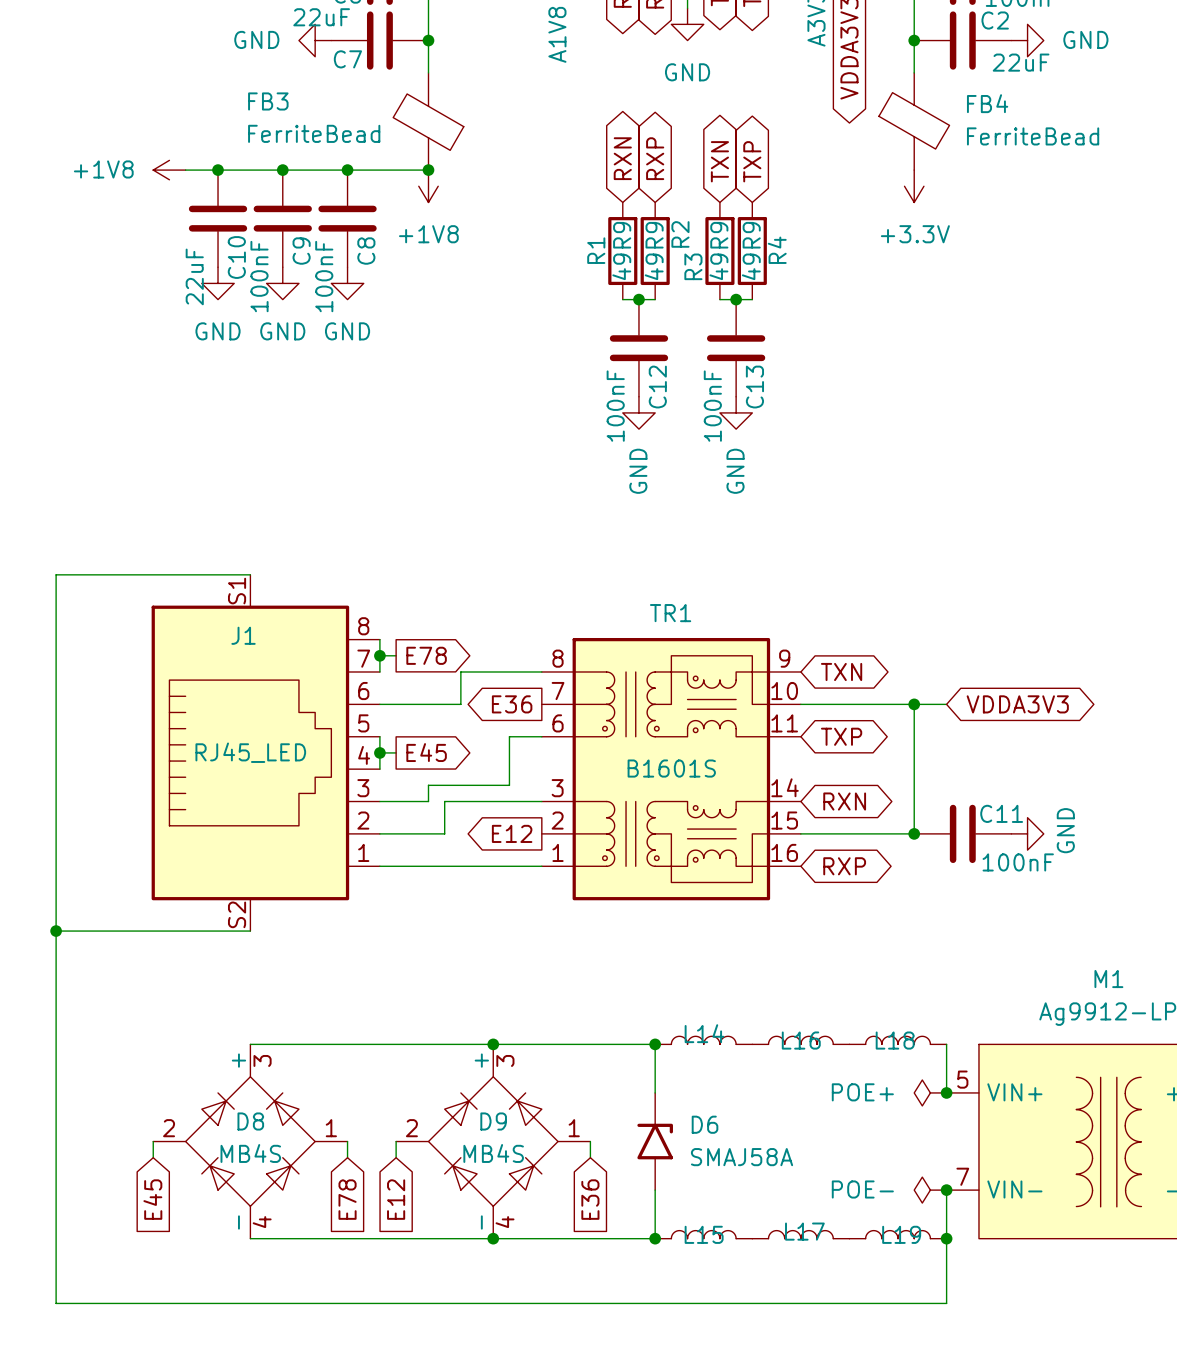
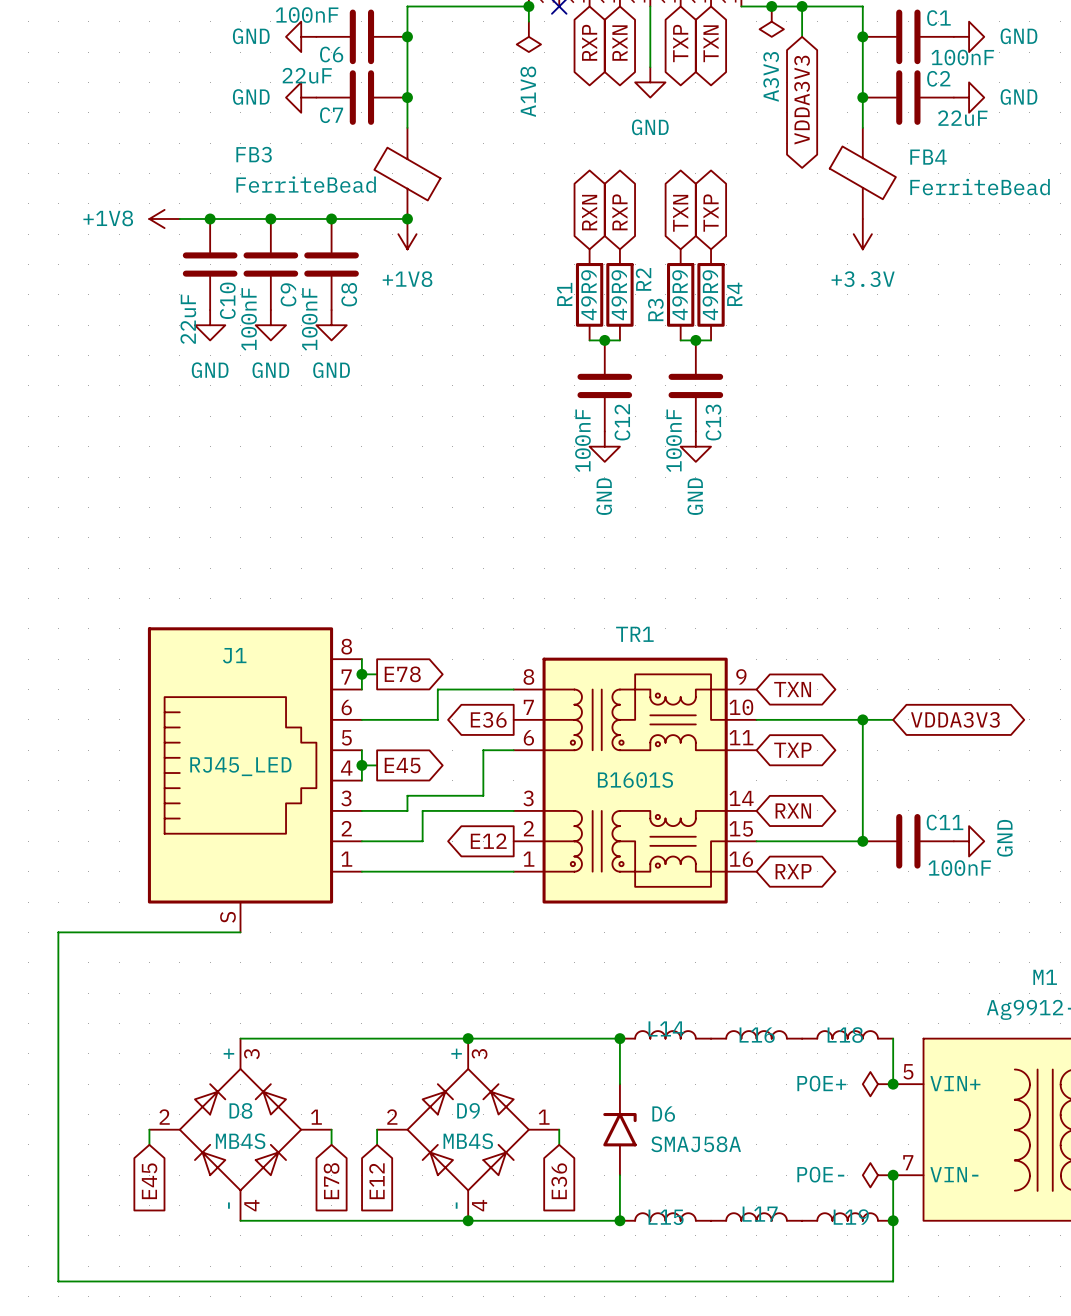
J1 symbol: [151, 574, 380, 932] -> [147, 627, 362, 933]
wire: (250, 574) (56, 574) (56, 931) -> none
junction: (56, 931) -> none

